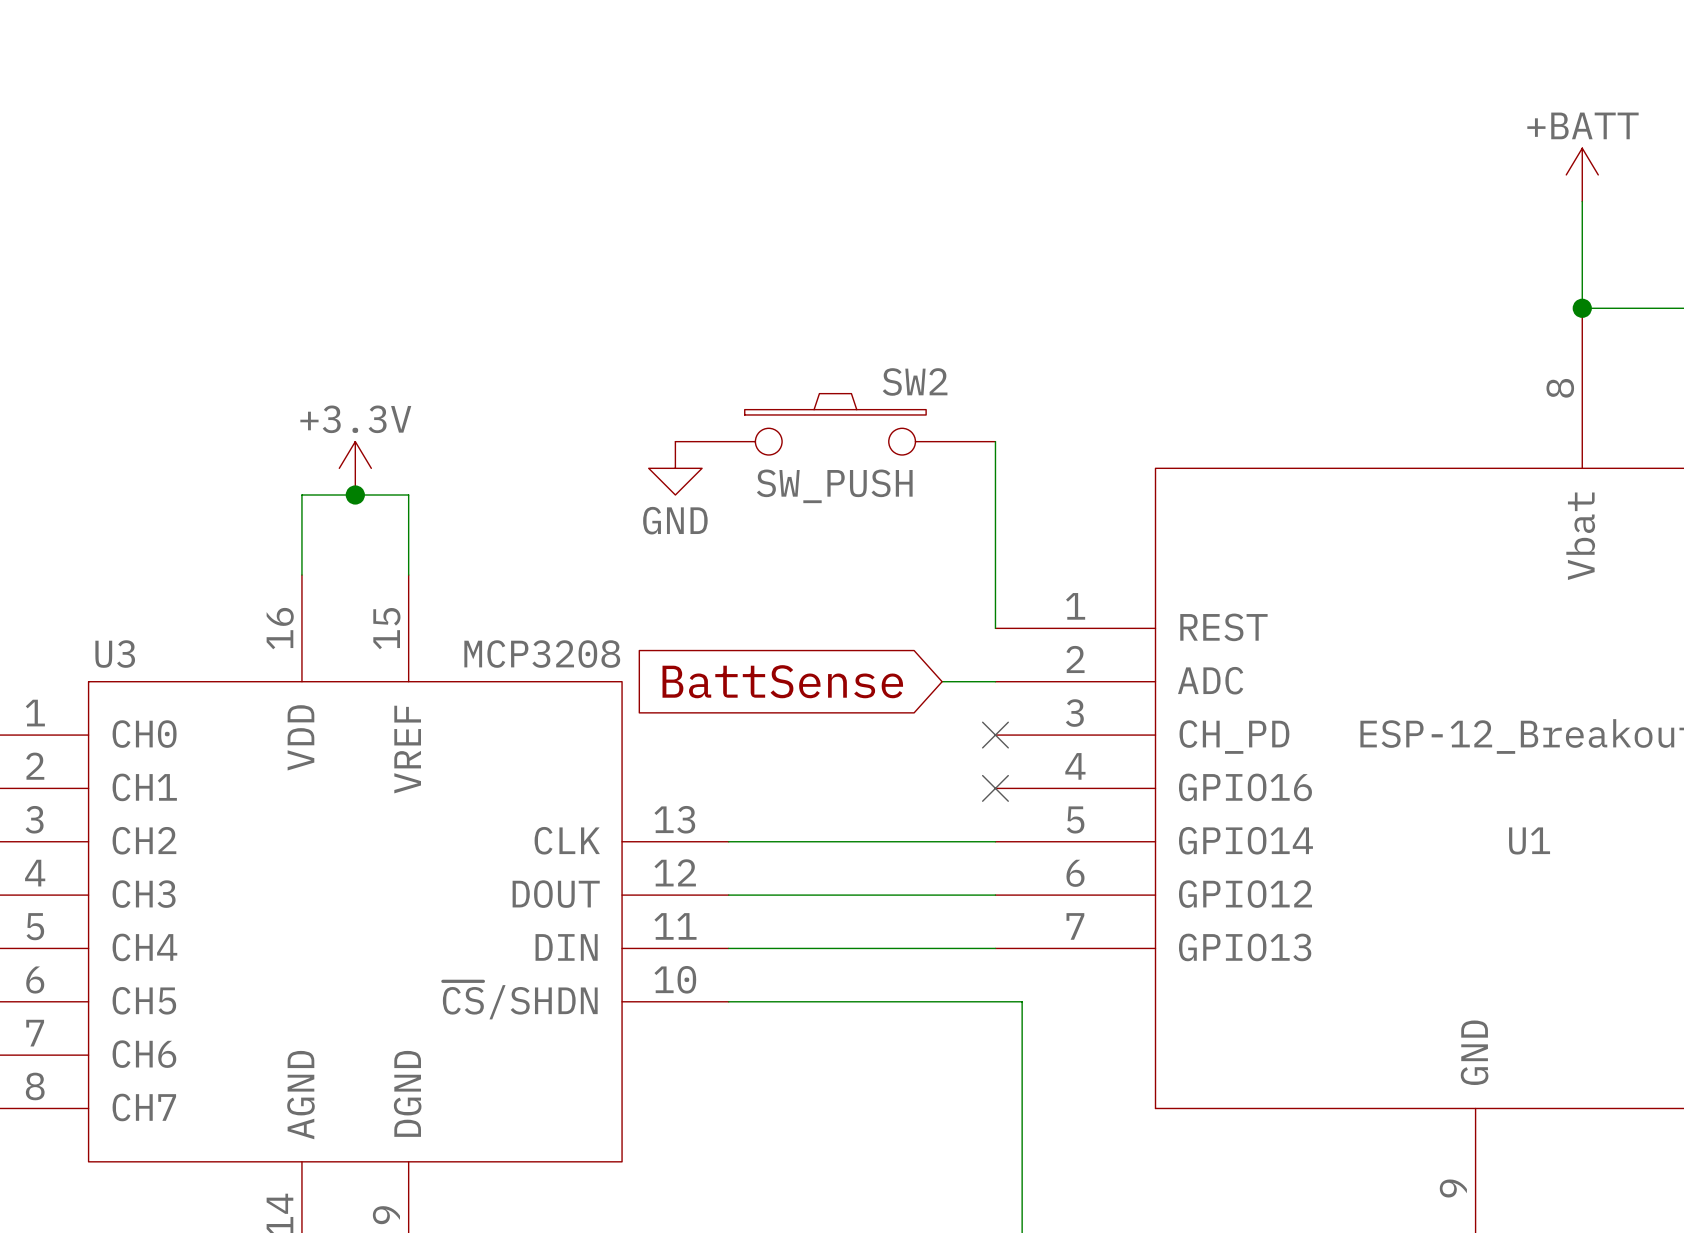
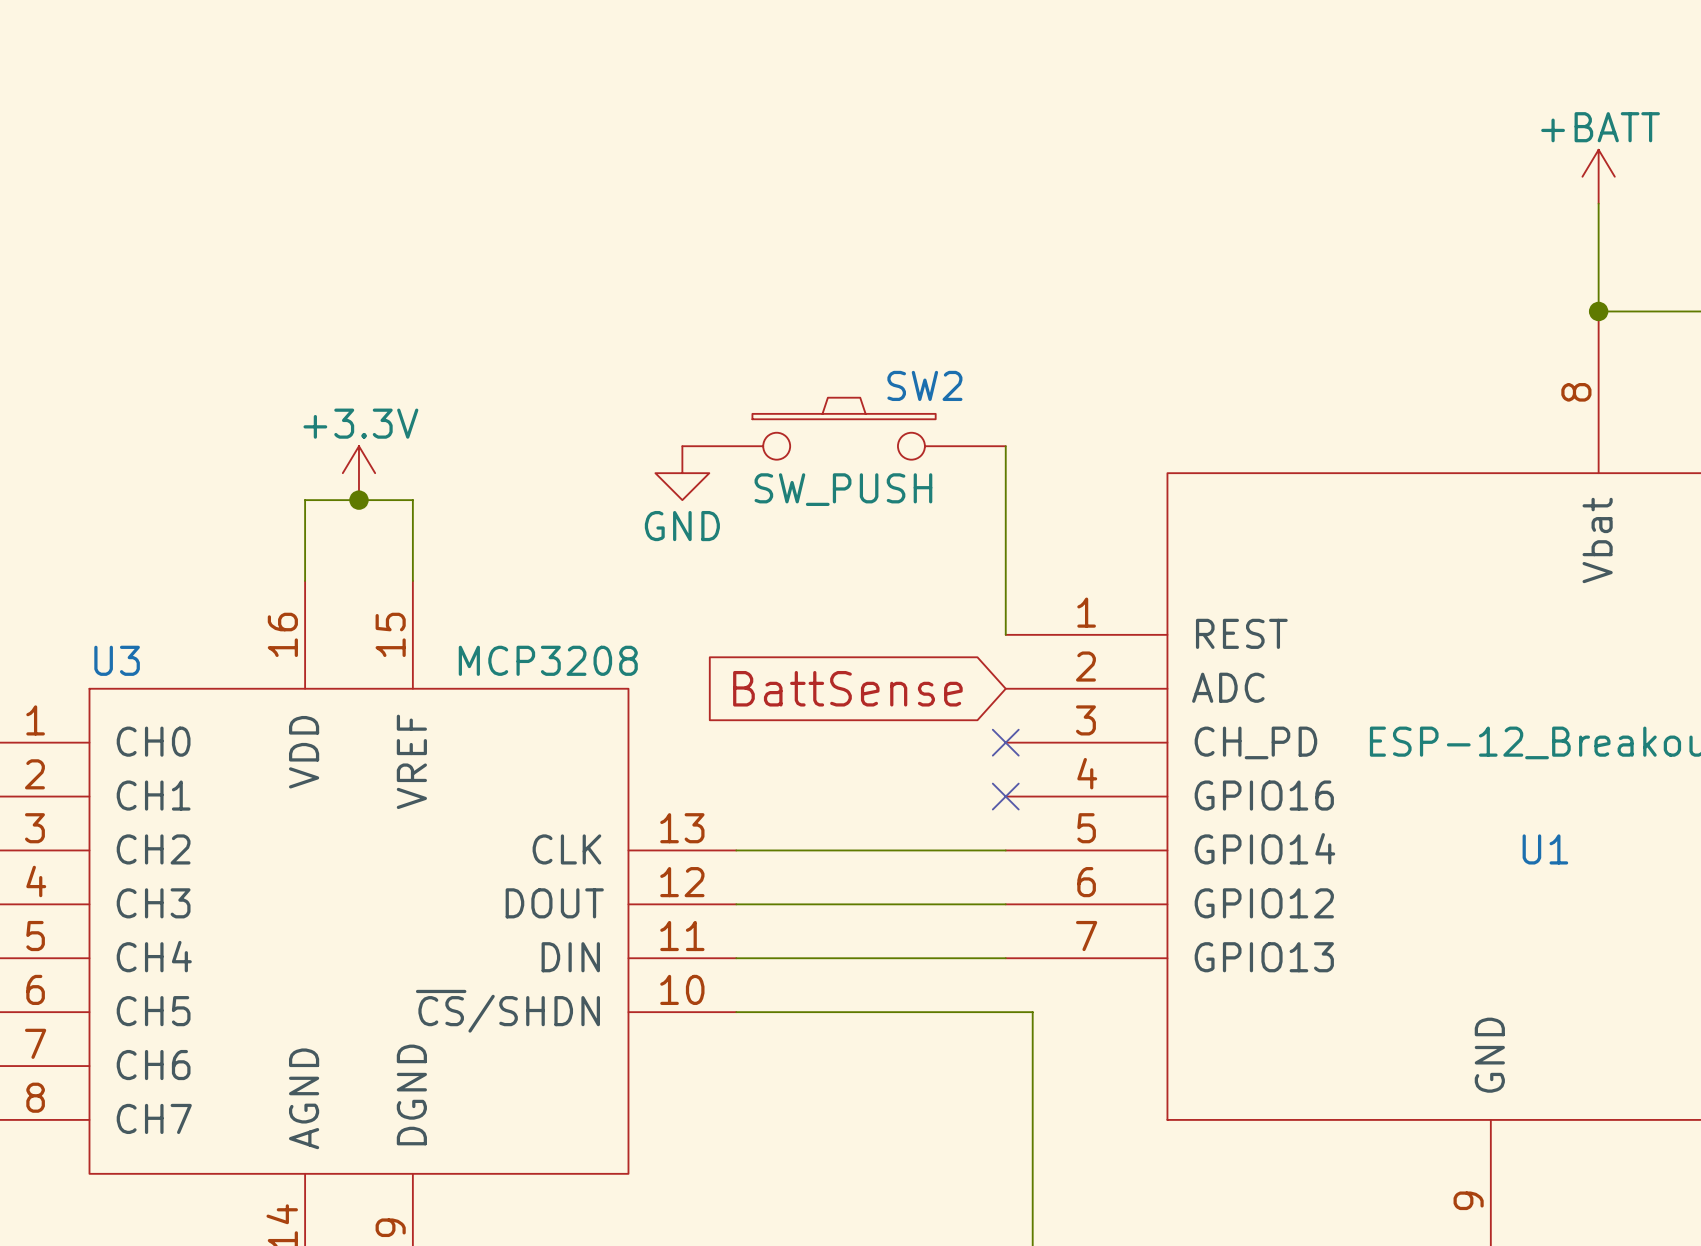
global label position: BattSense (782, 681) -> BattSense (847, 688)
wire: (942, 681) (995, 681) -> none

